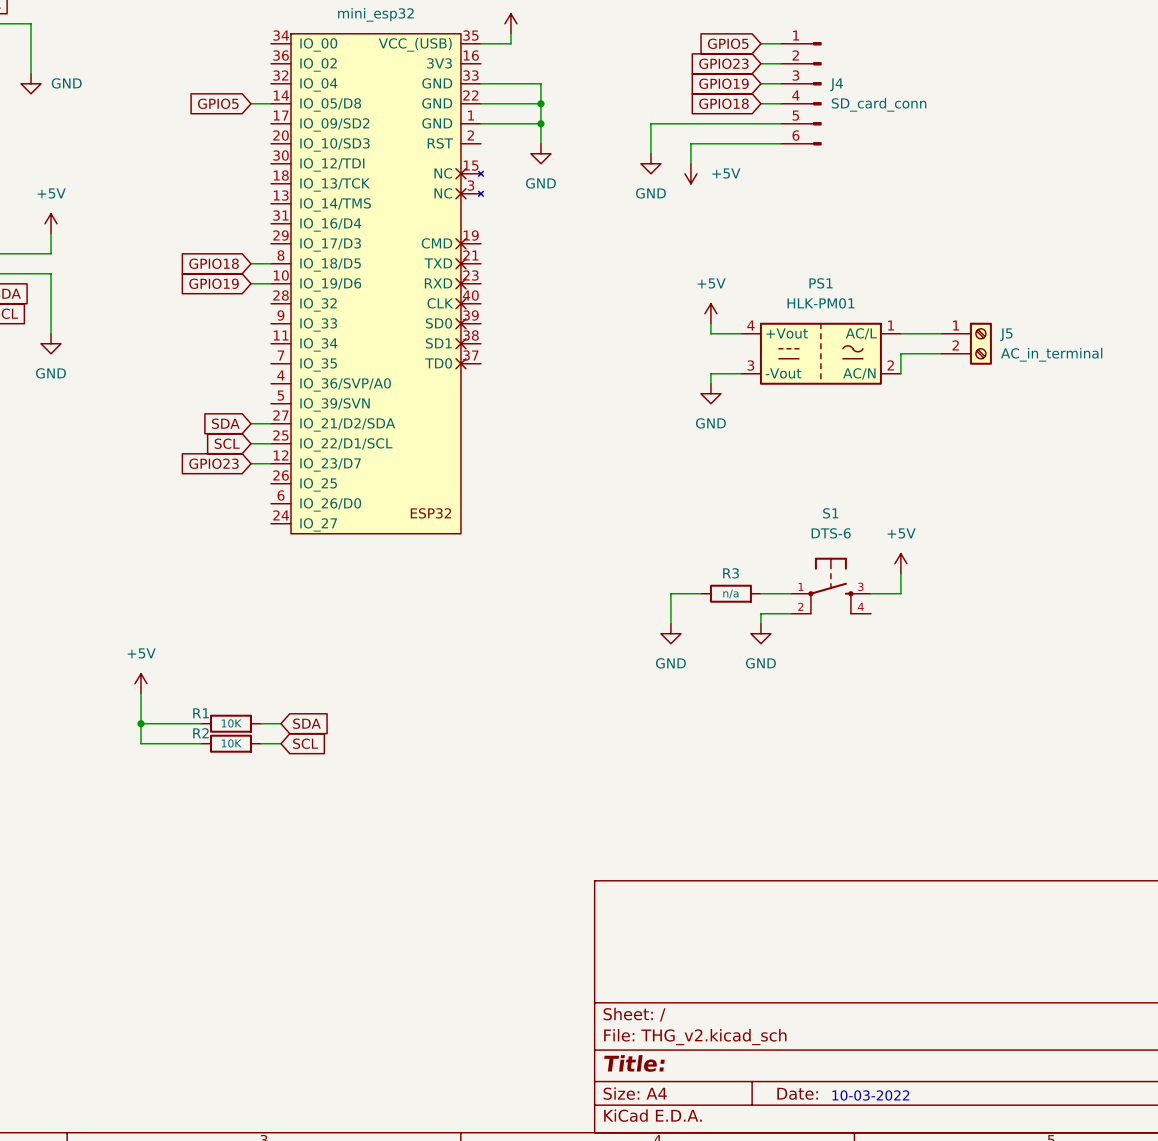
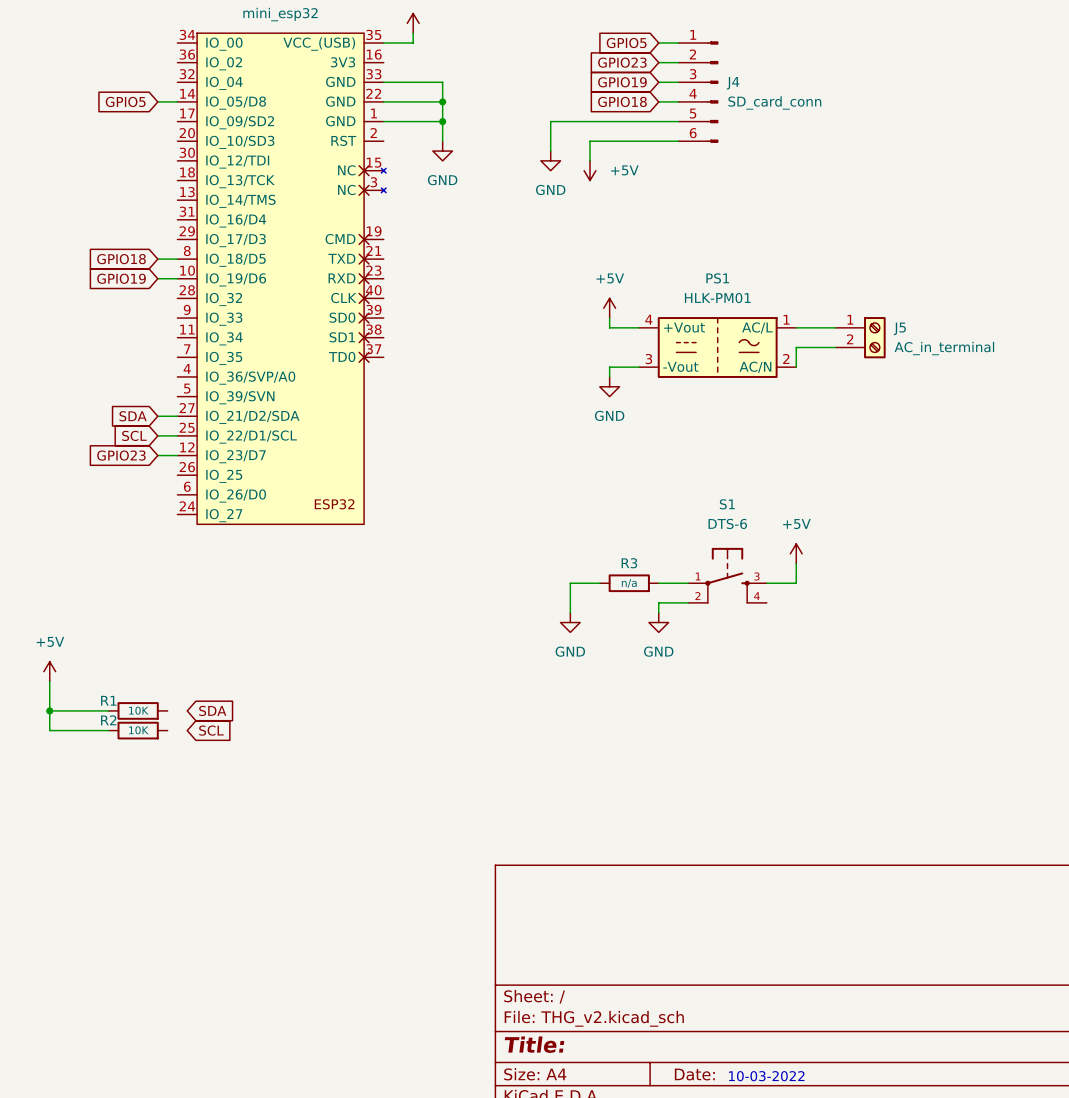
wire: (260, 723) (280, 723) -> none
wire: (260, 743) (280, 743) -> none

